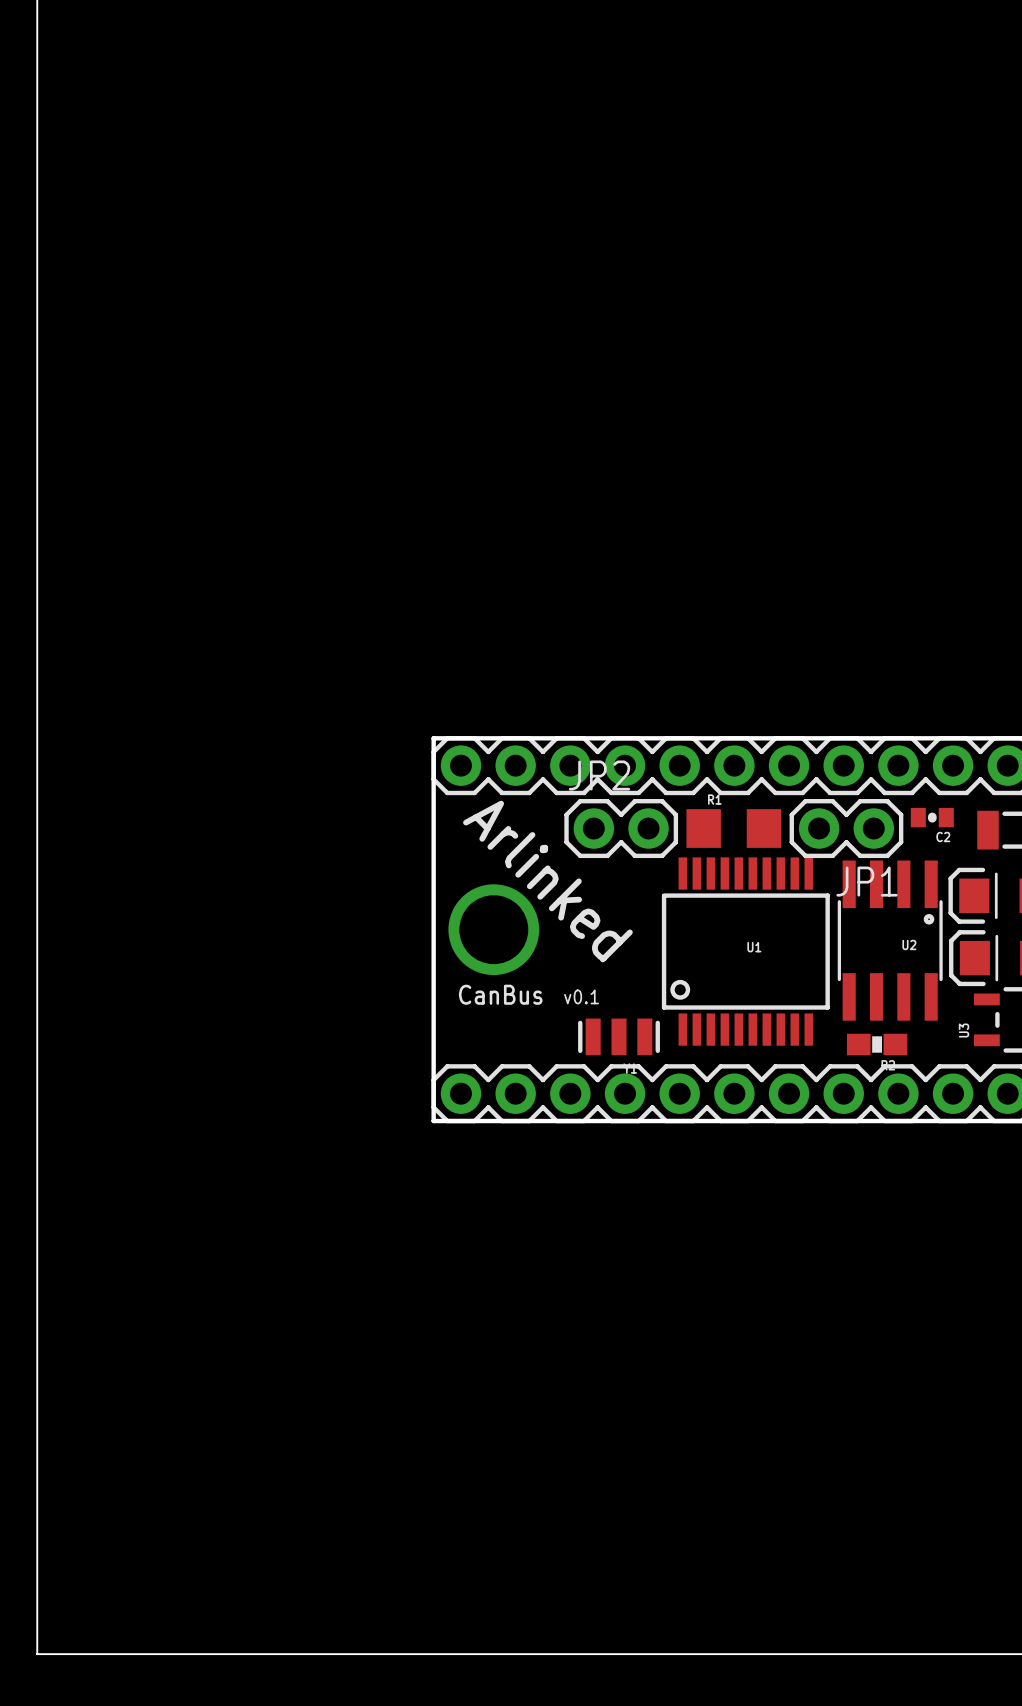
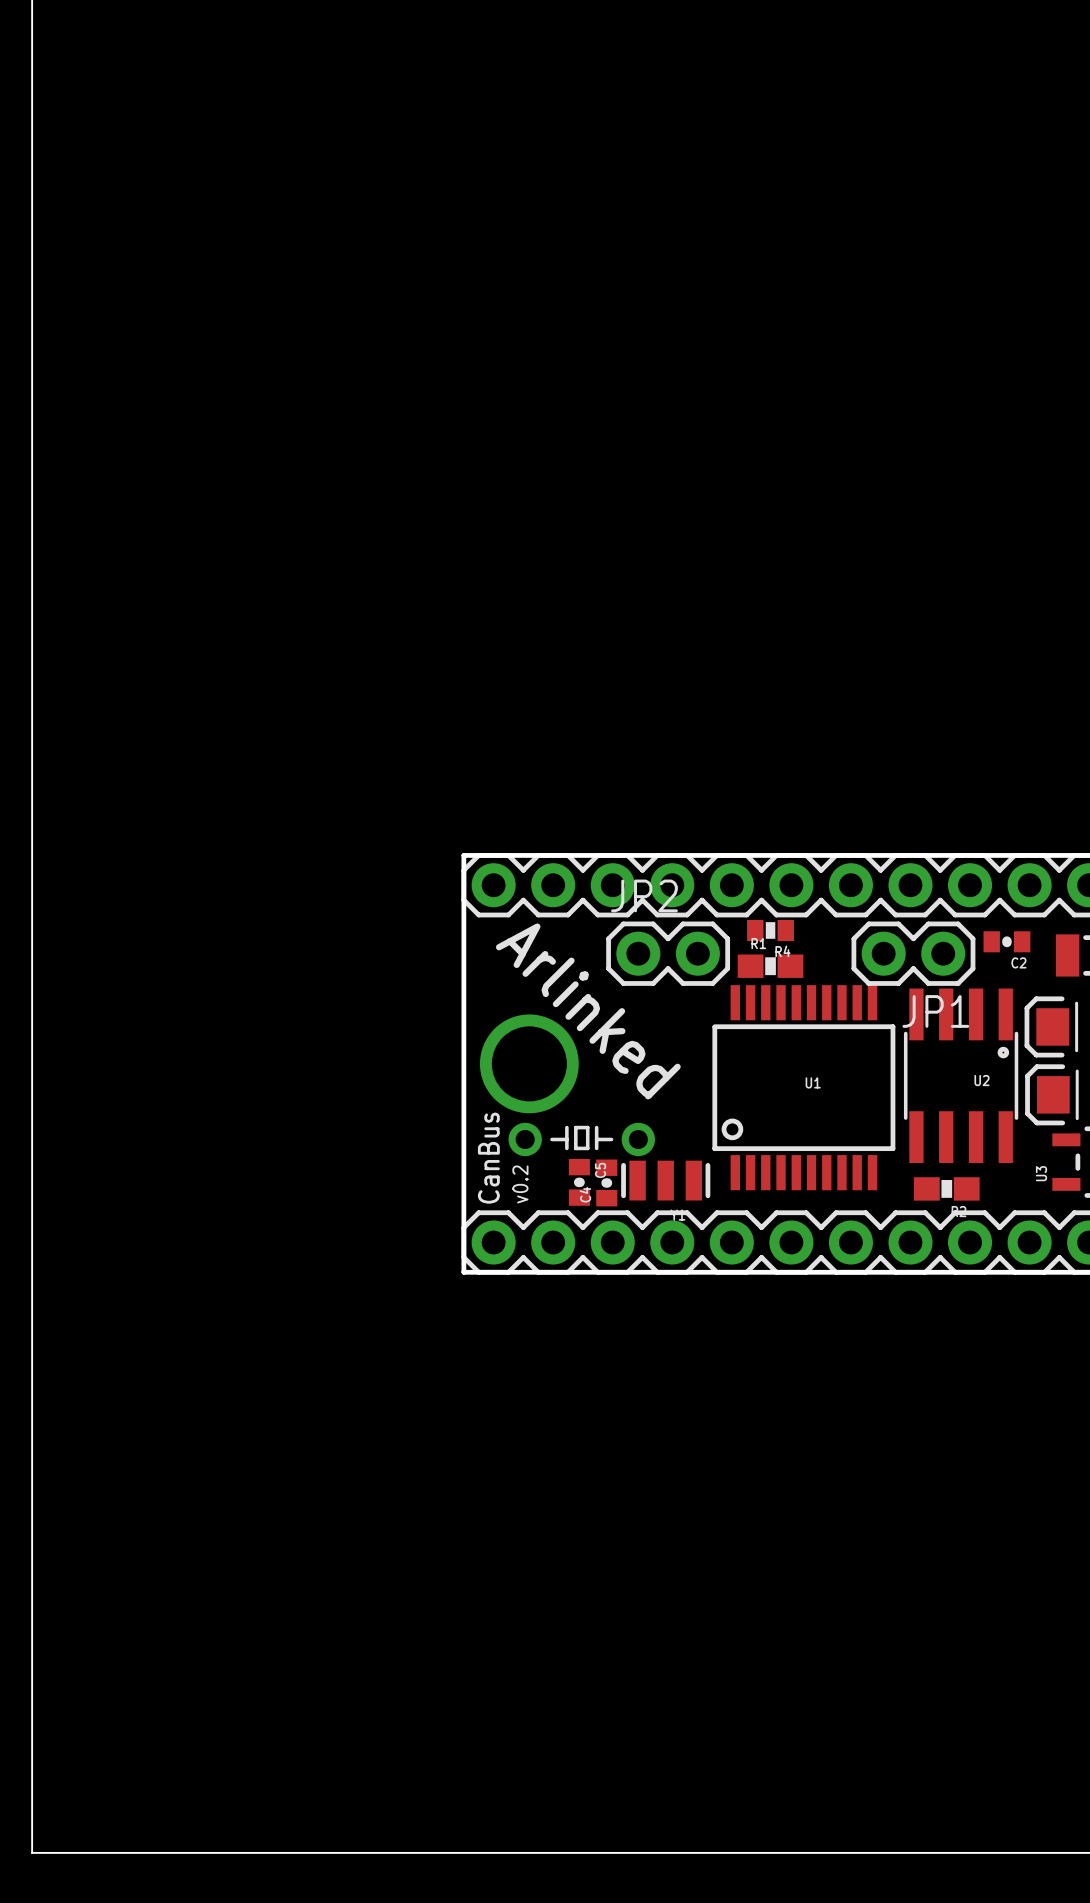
R4: none -> (770, 930)
R1 footprint: [686, 809, 782, 848] -> [737, 954, 804, 978]
text rotation: 0° (500, 994) -> 90° counterclockwise (488, 1158)
text: v0.1 (581, 996) -> none
part: none -> (581, 1139)
C5: none -> (579, 1182)
C4: none -> (606, 1182)
text: none -> v0.2 (520, 1184)

